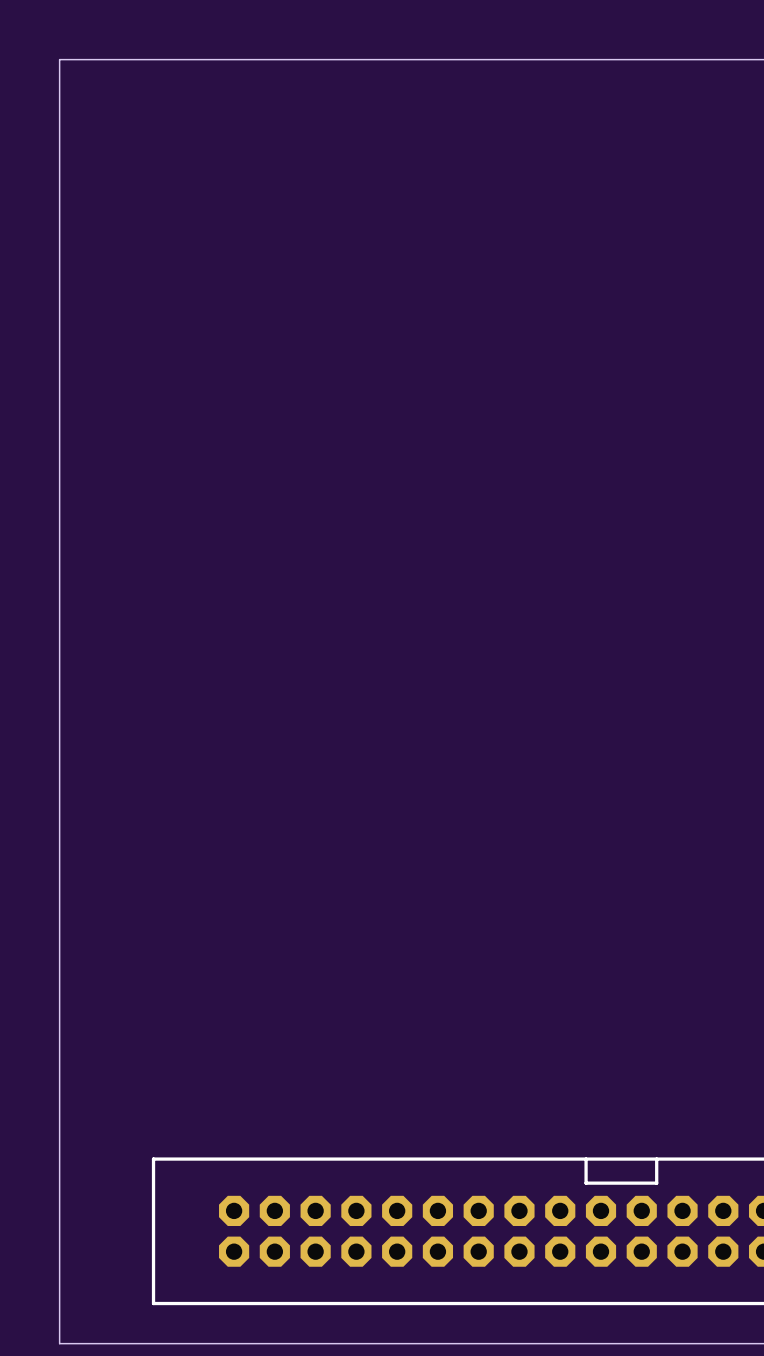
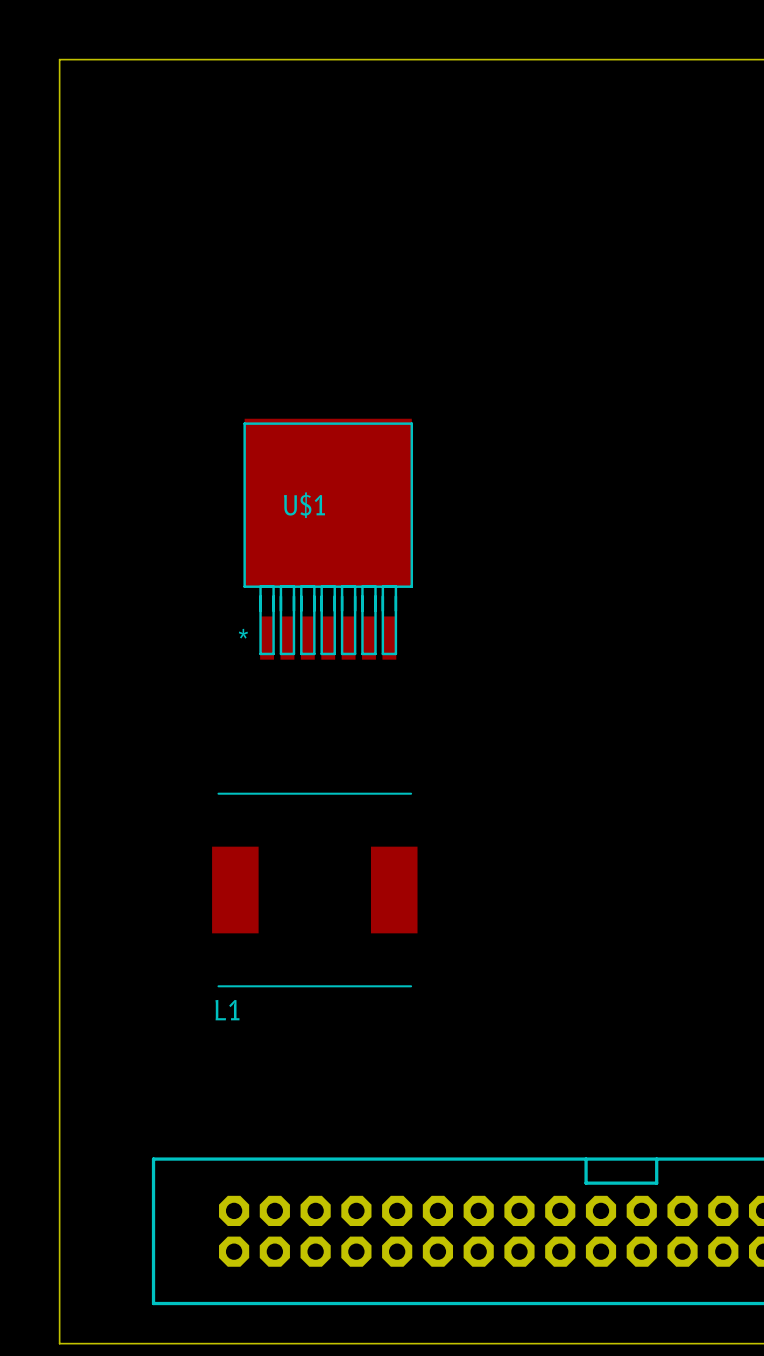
U$1: none -> (328, 539)
L1: none -> (314, 890)

